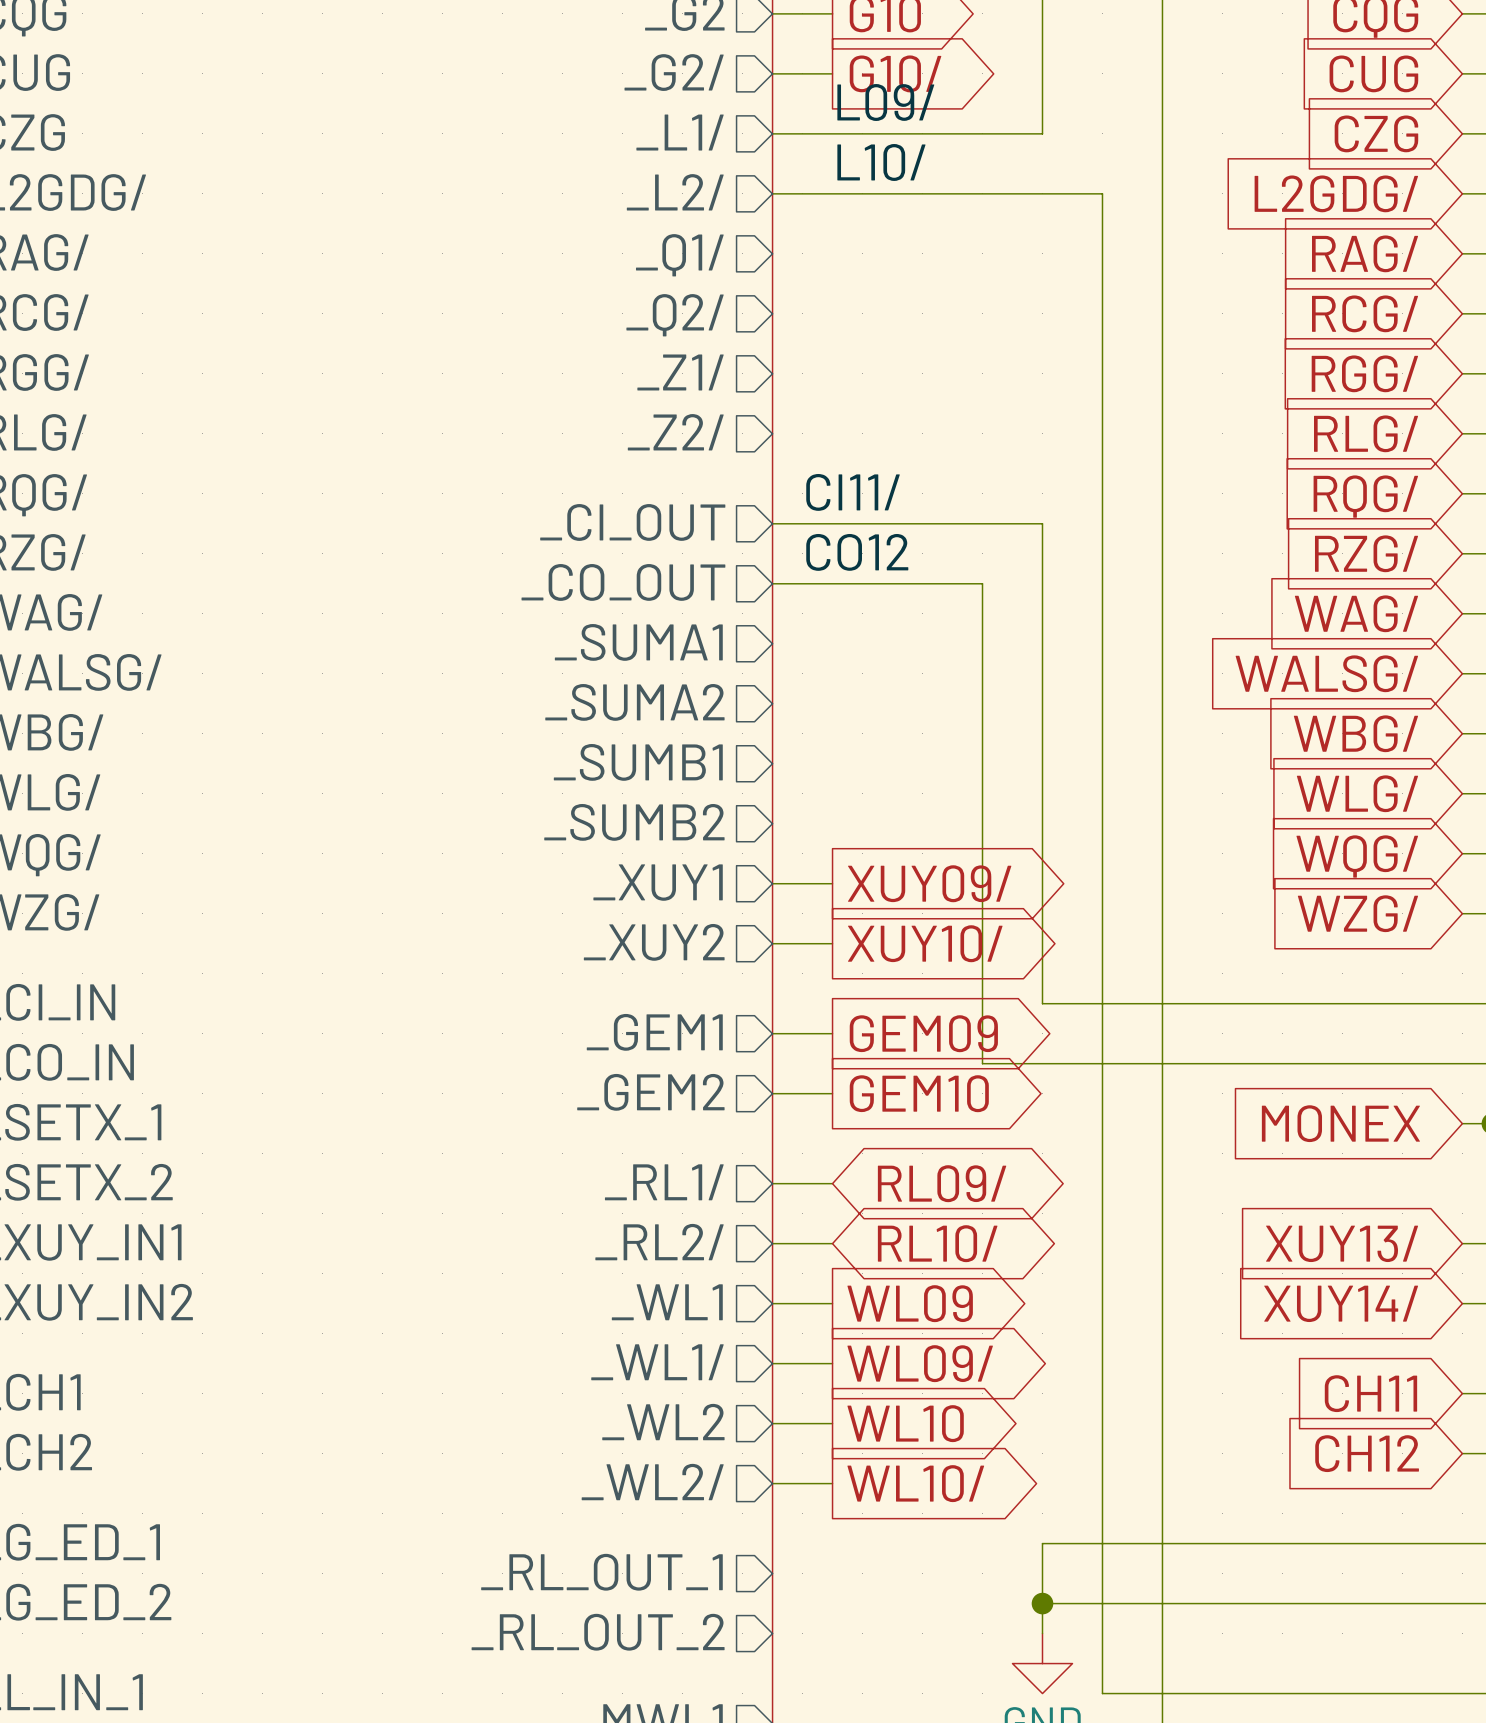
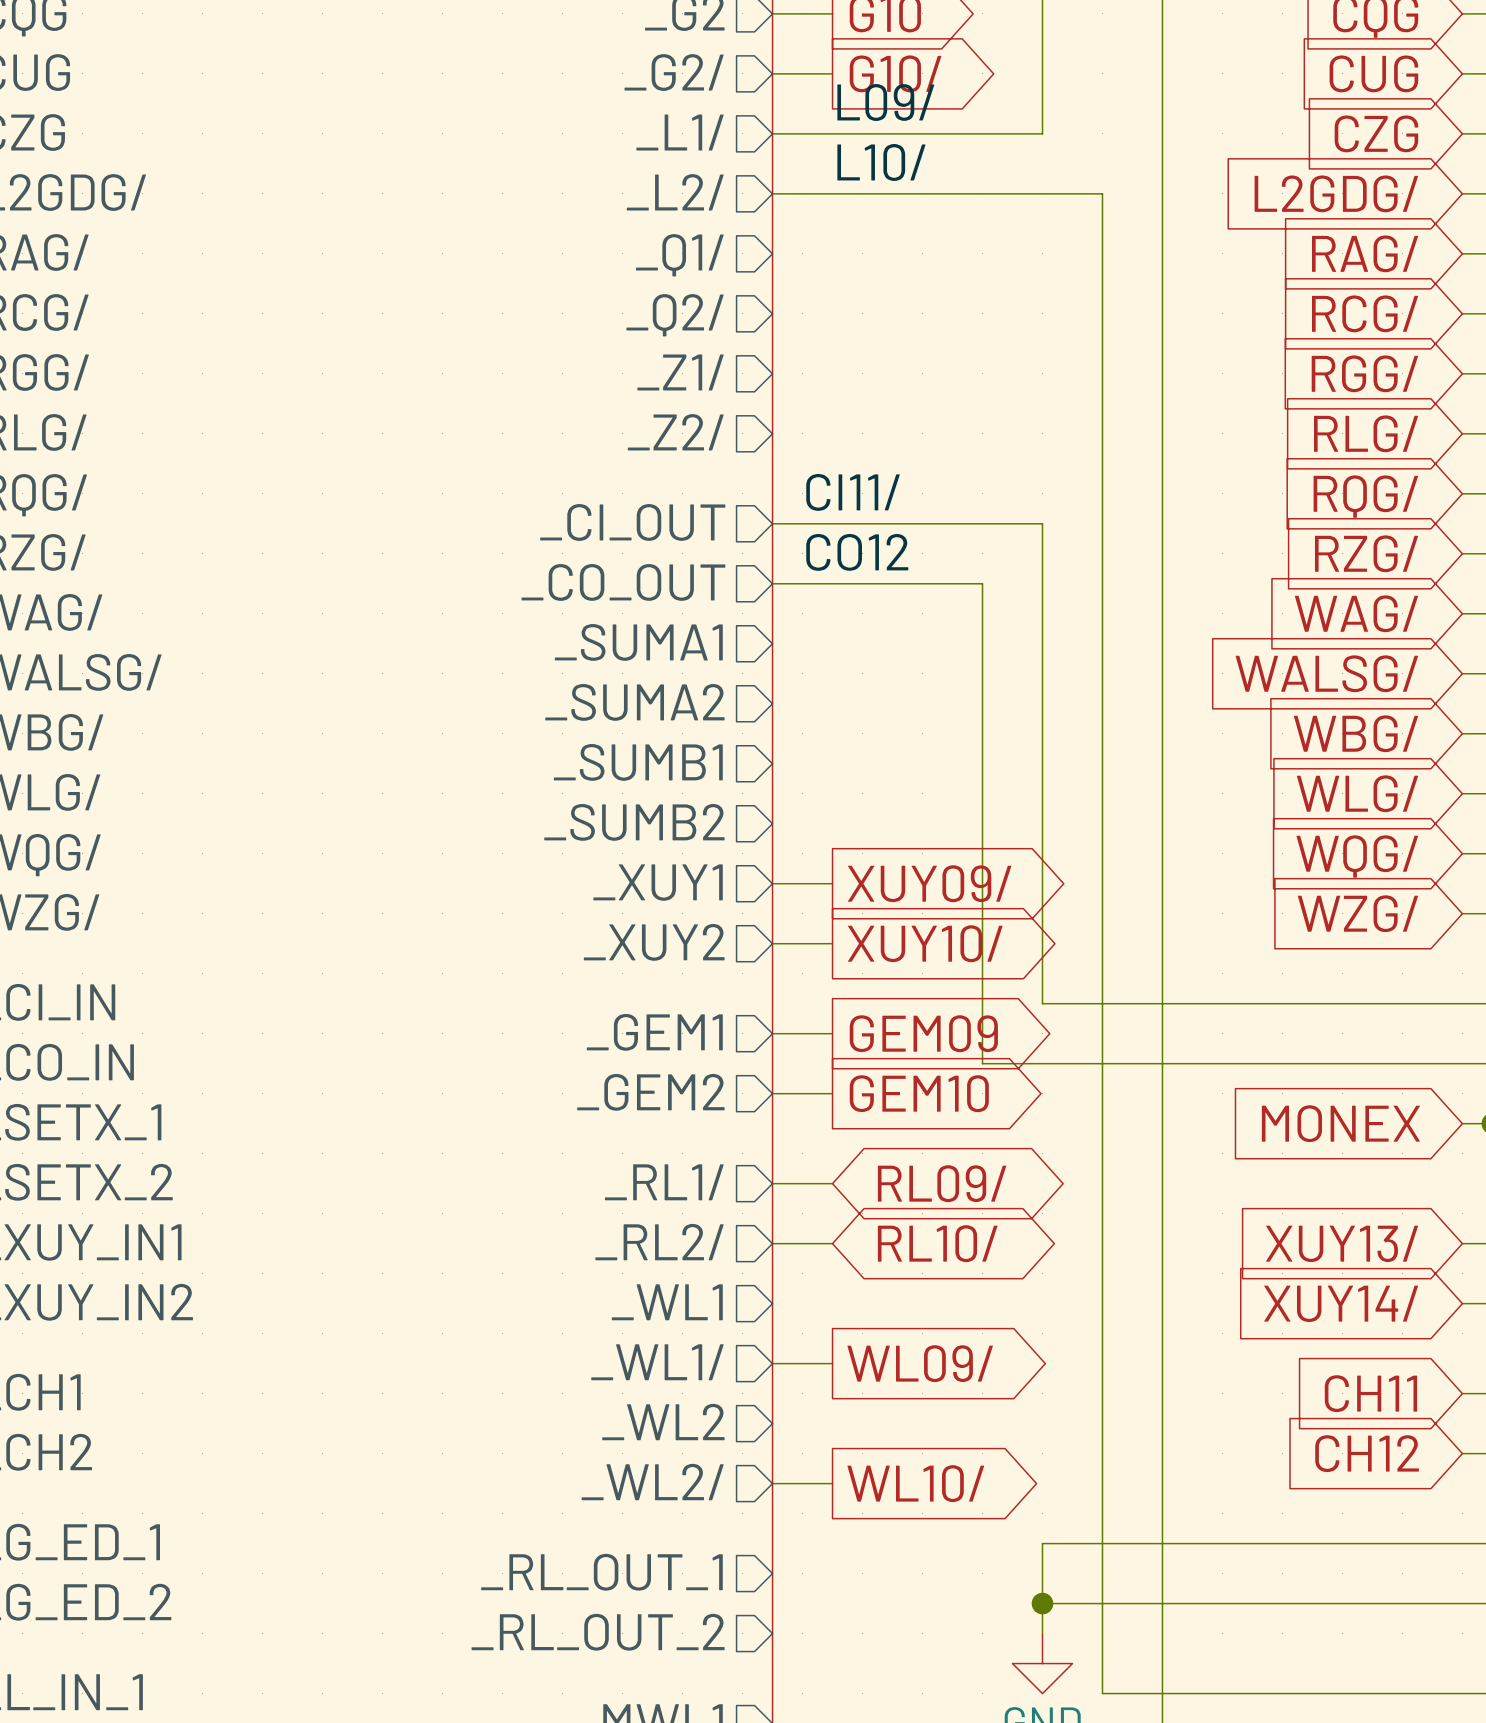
wire: (772, 1303) (832, 1303) -> none
global label: WL09 (910, 1303) -> none
wire: (772, 1423) (832, 1423) -> none
global label: WL10 (905, 1423) -> none

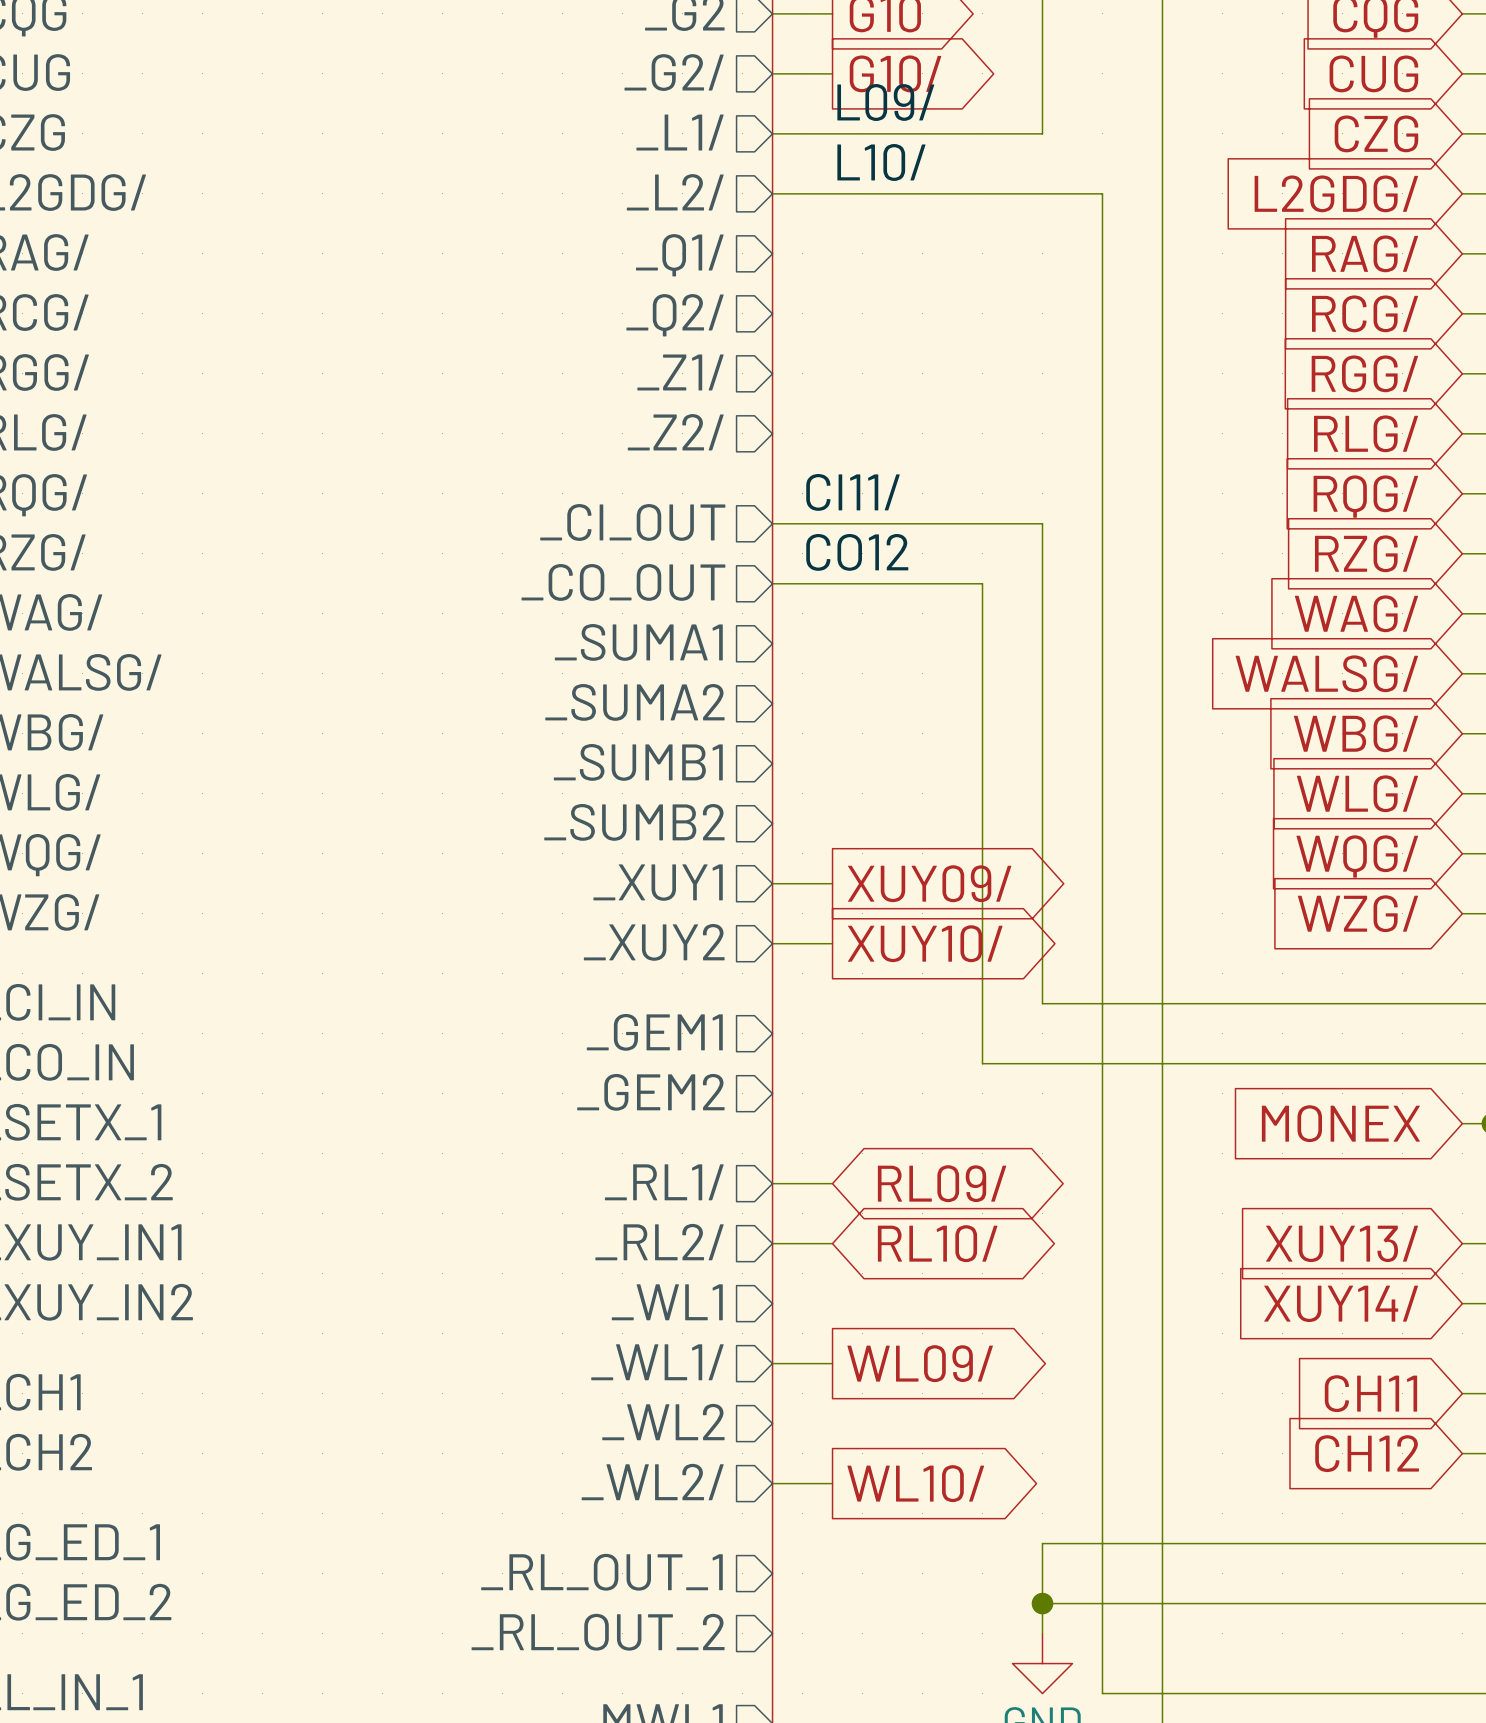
wire: (772, 1033) (832, 1033) -> none
global label: GEM09 (923, 1033) -> none
wire: (772, 1093) (832, 1093) -> none
global label: GEM10 (919, 1093) -> none

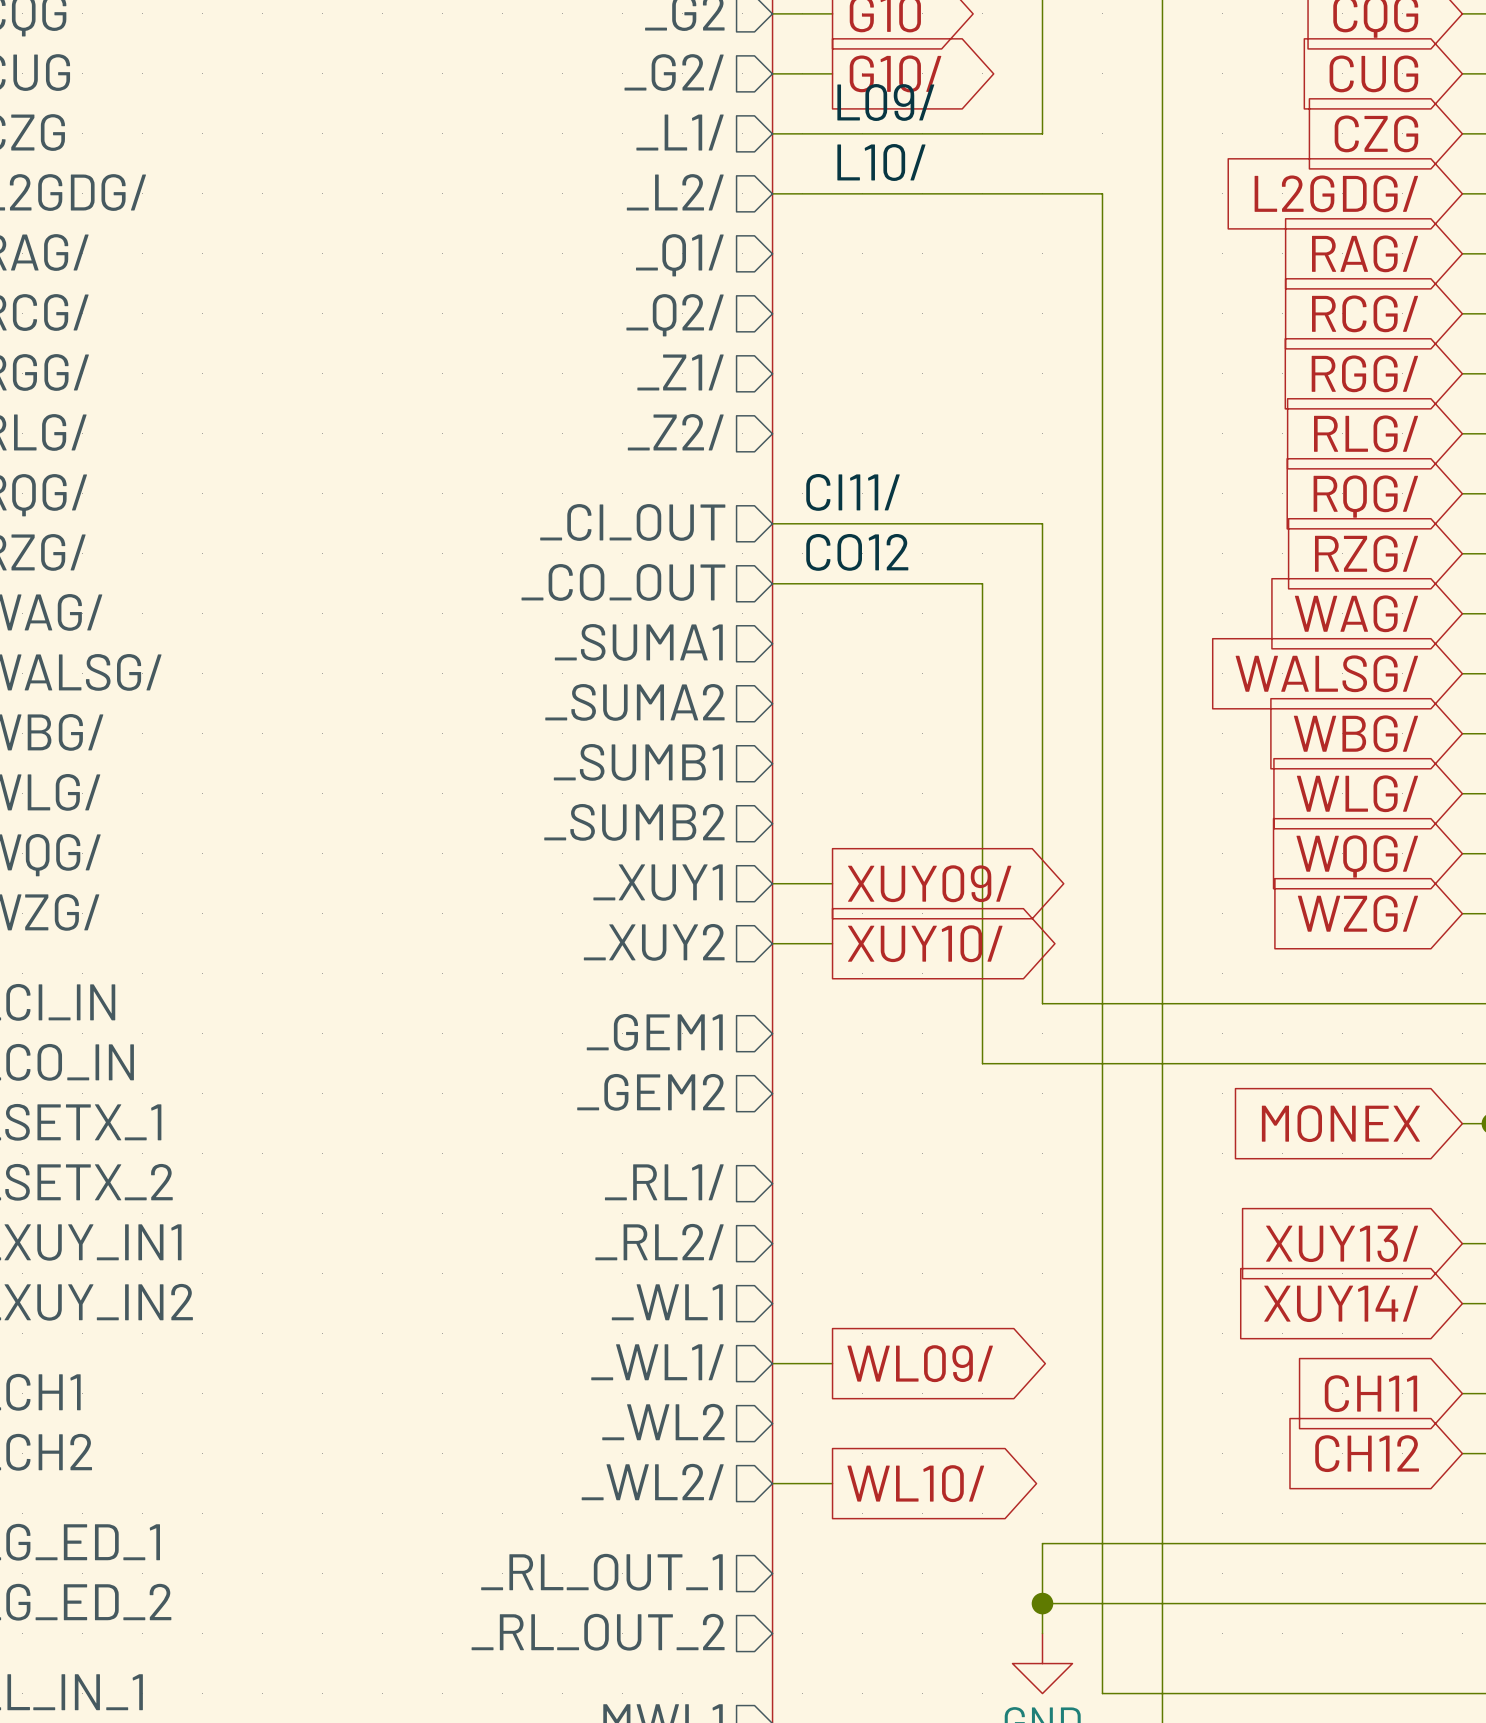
wire: (772, 1183) (832, 1183) -> none
global label: RL09/ (942, 1183) -> none
wire: (772, 1243) (832, 1243) -> none
global label: RL10/ (937, 1243) -> none

